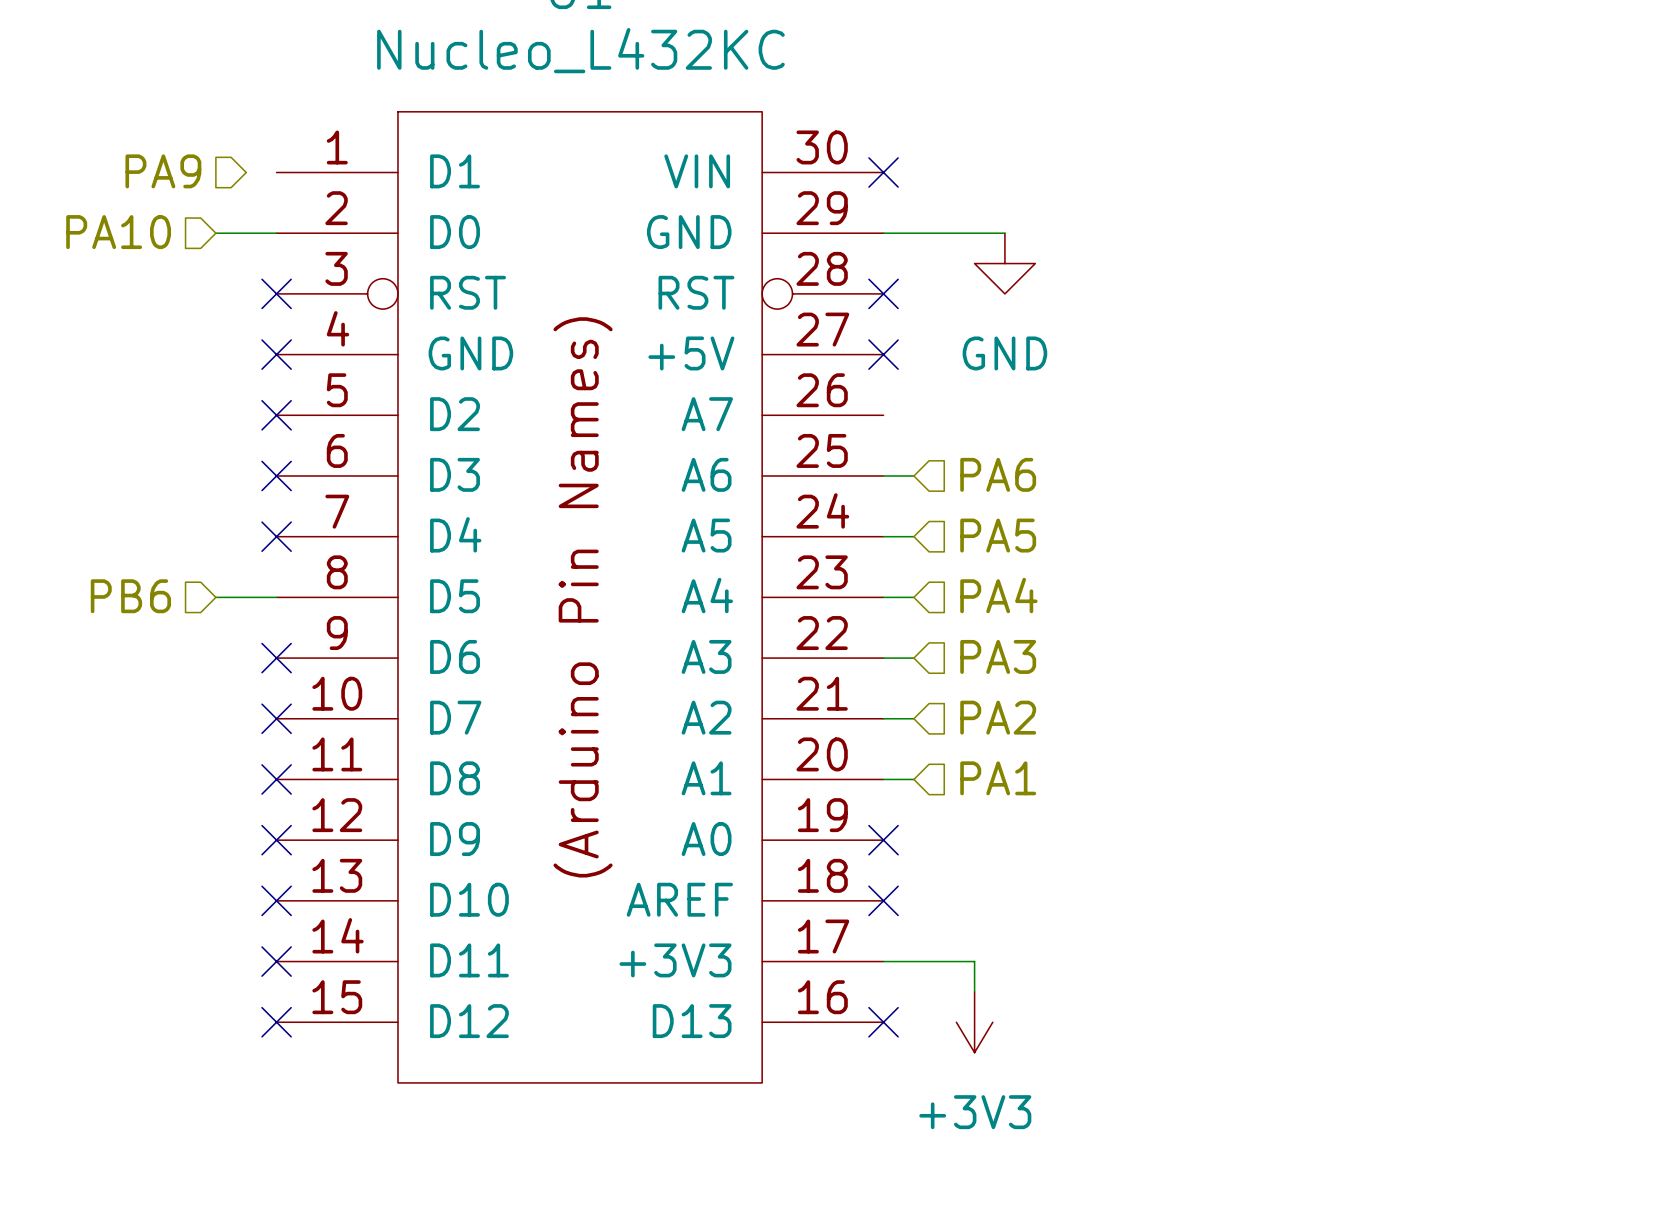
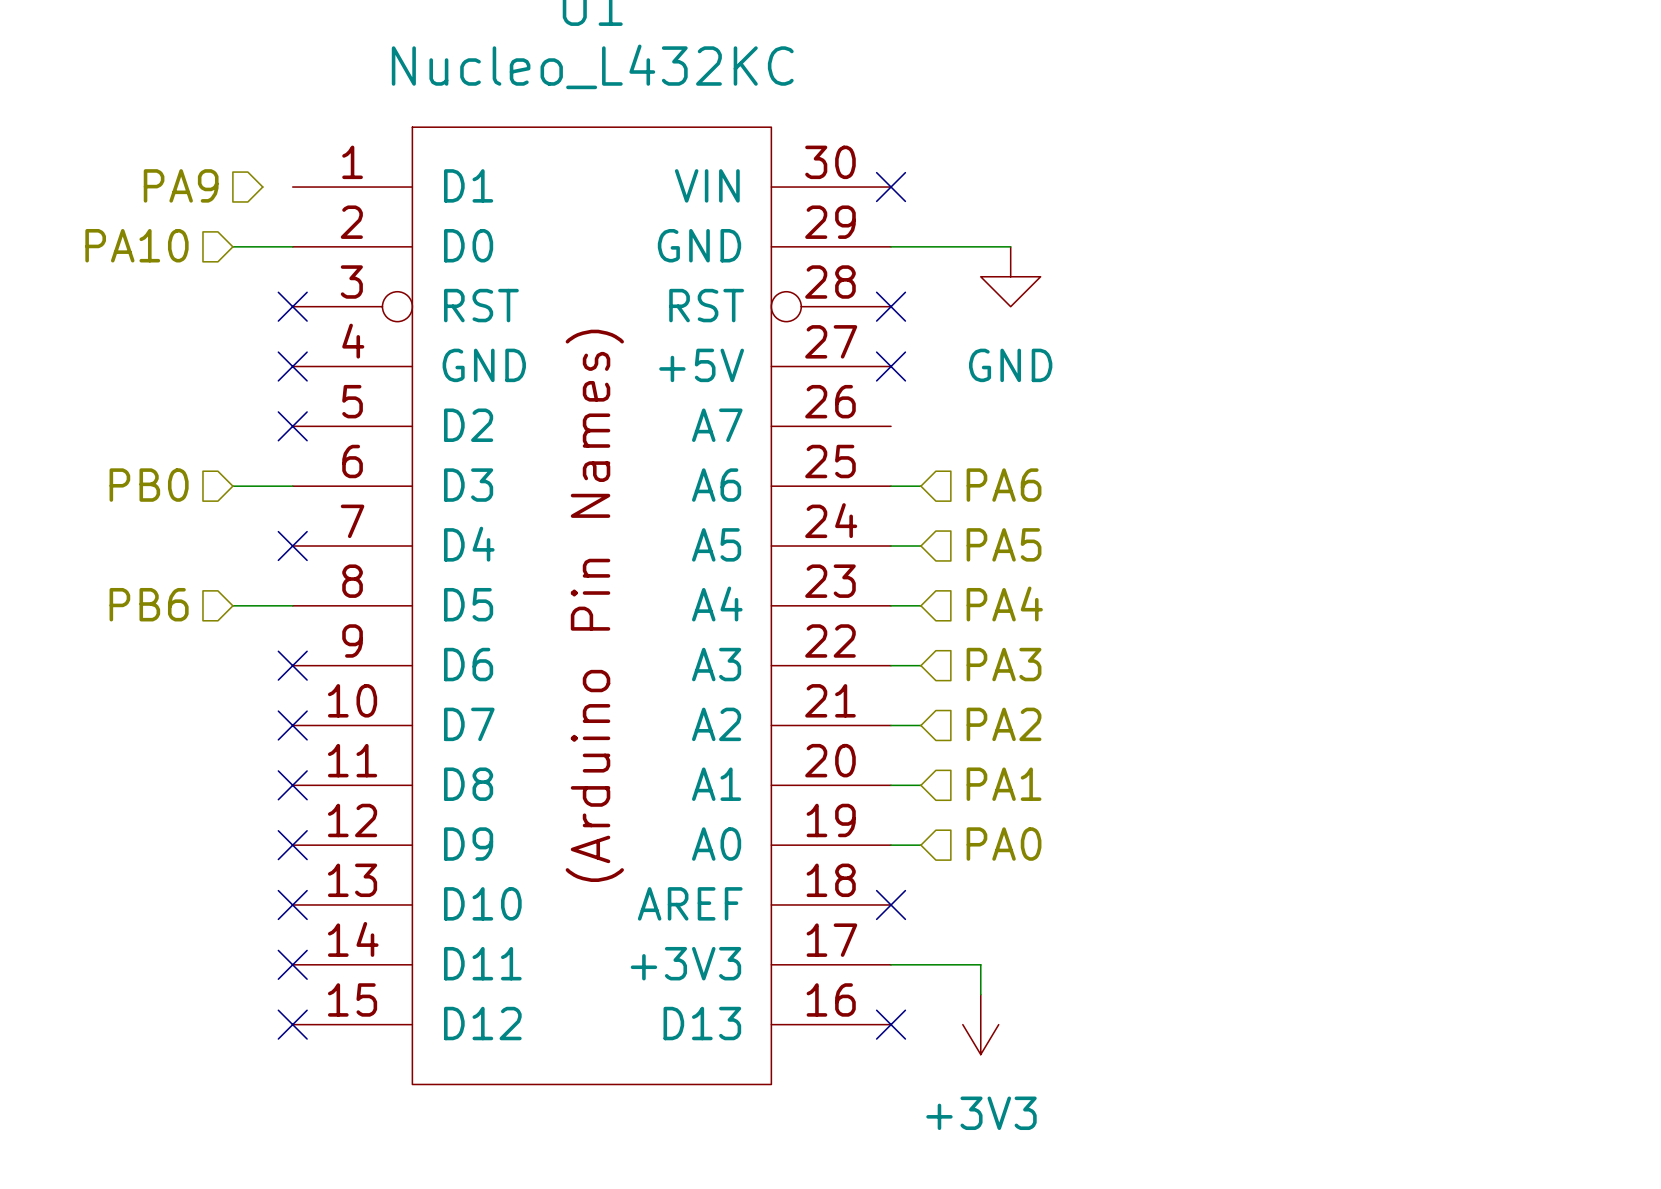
hierarchical label: none -> PB0 (149, 485)
wire: none -> (232, 486) (292, 486)
no-connect mark: (276, 475) -> none
hierarchical label: none -> PA0 (1004, 844)
wire: none -> (891, 845) (920, 845)
no-connect mark: (883, 840) -> none

